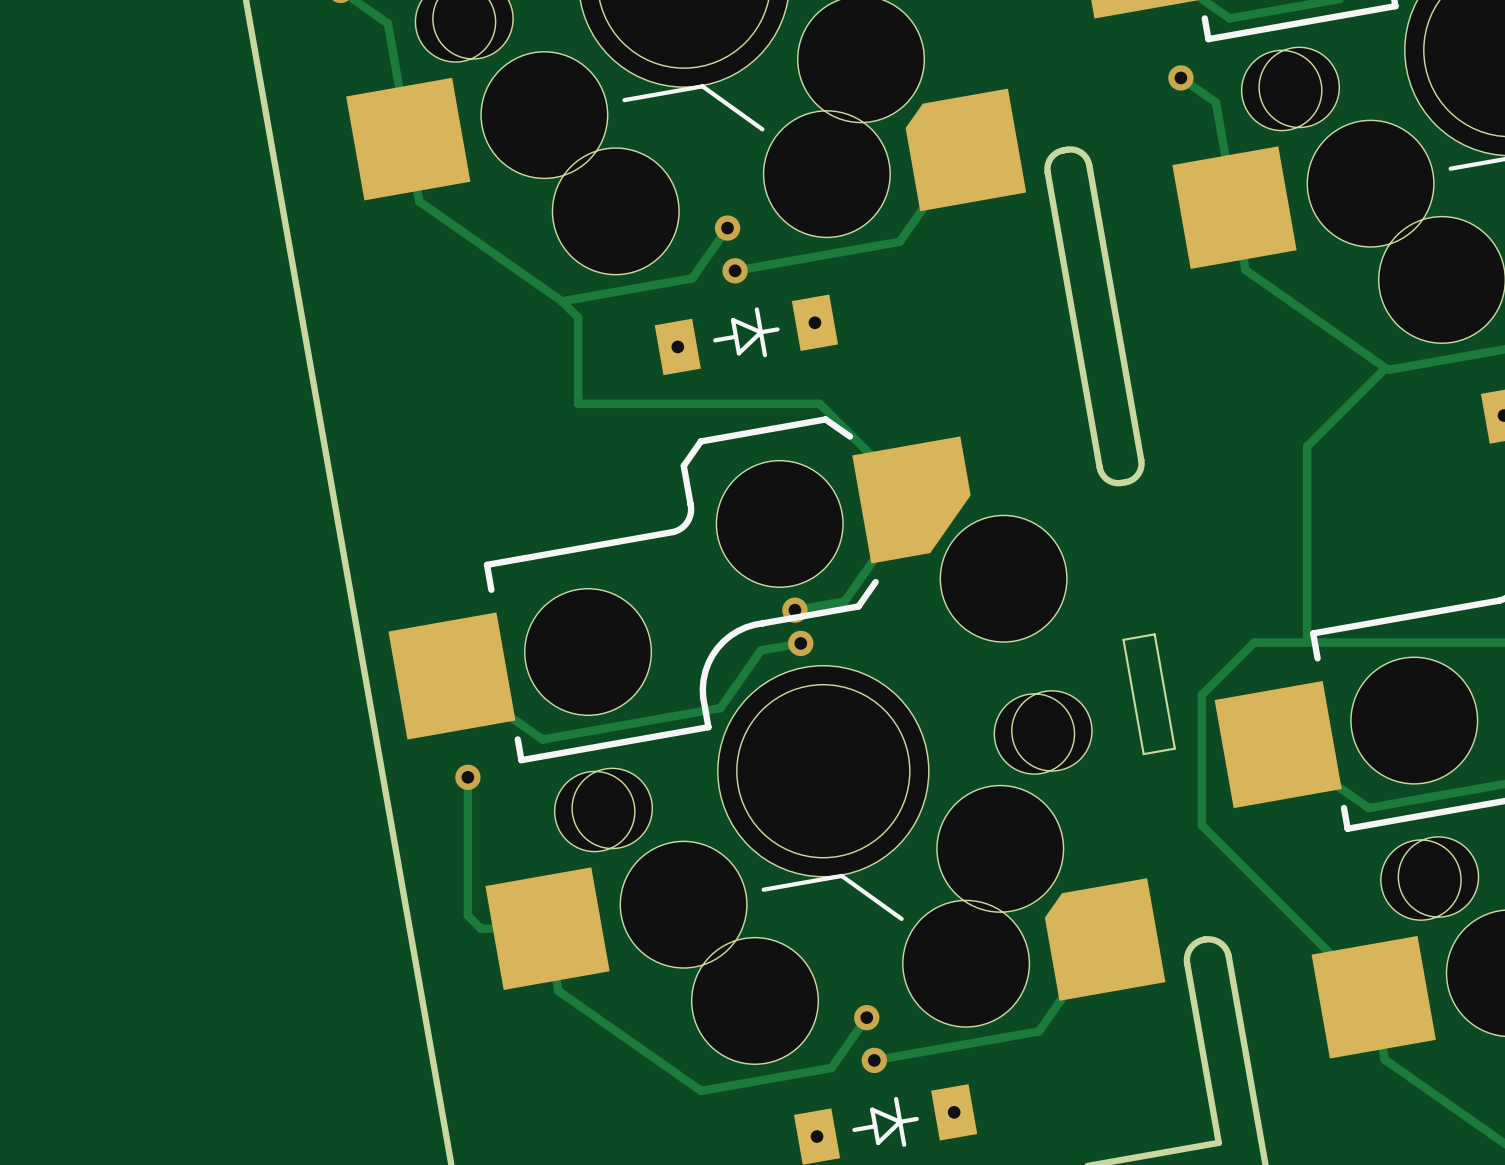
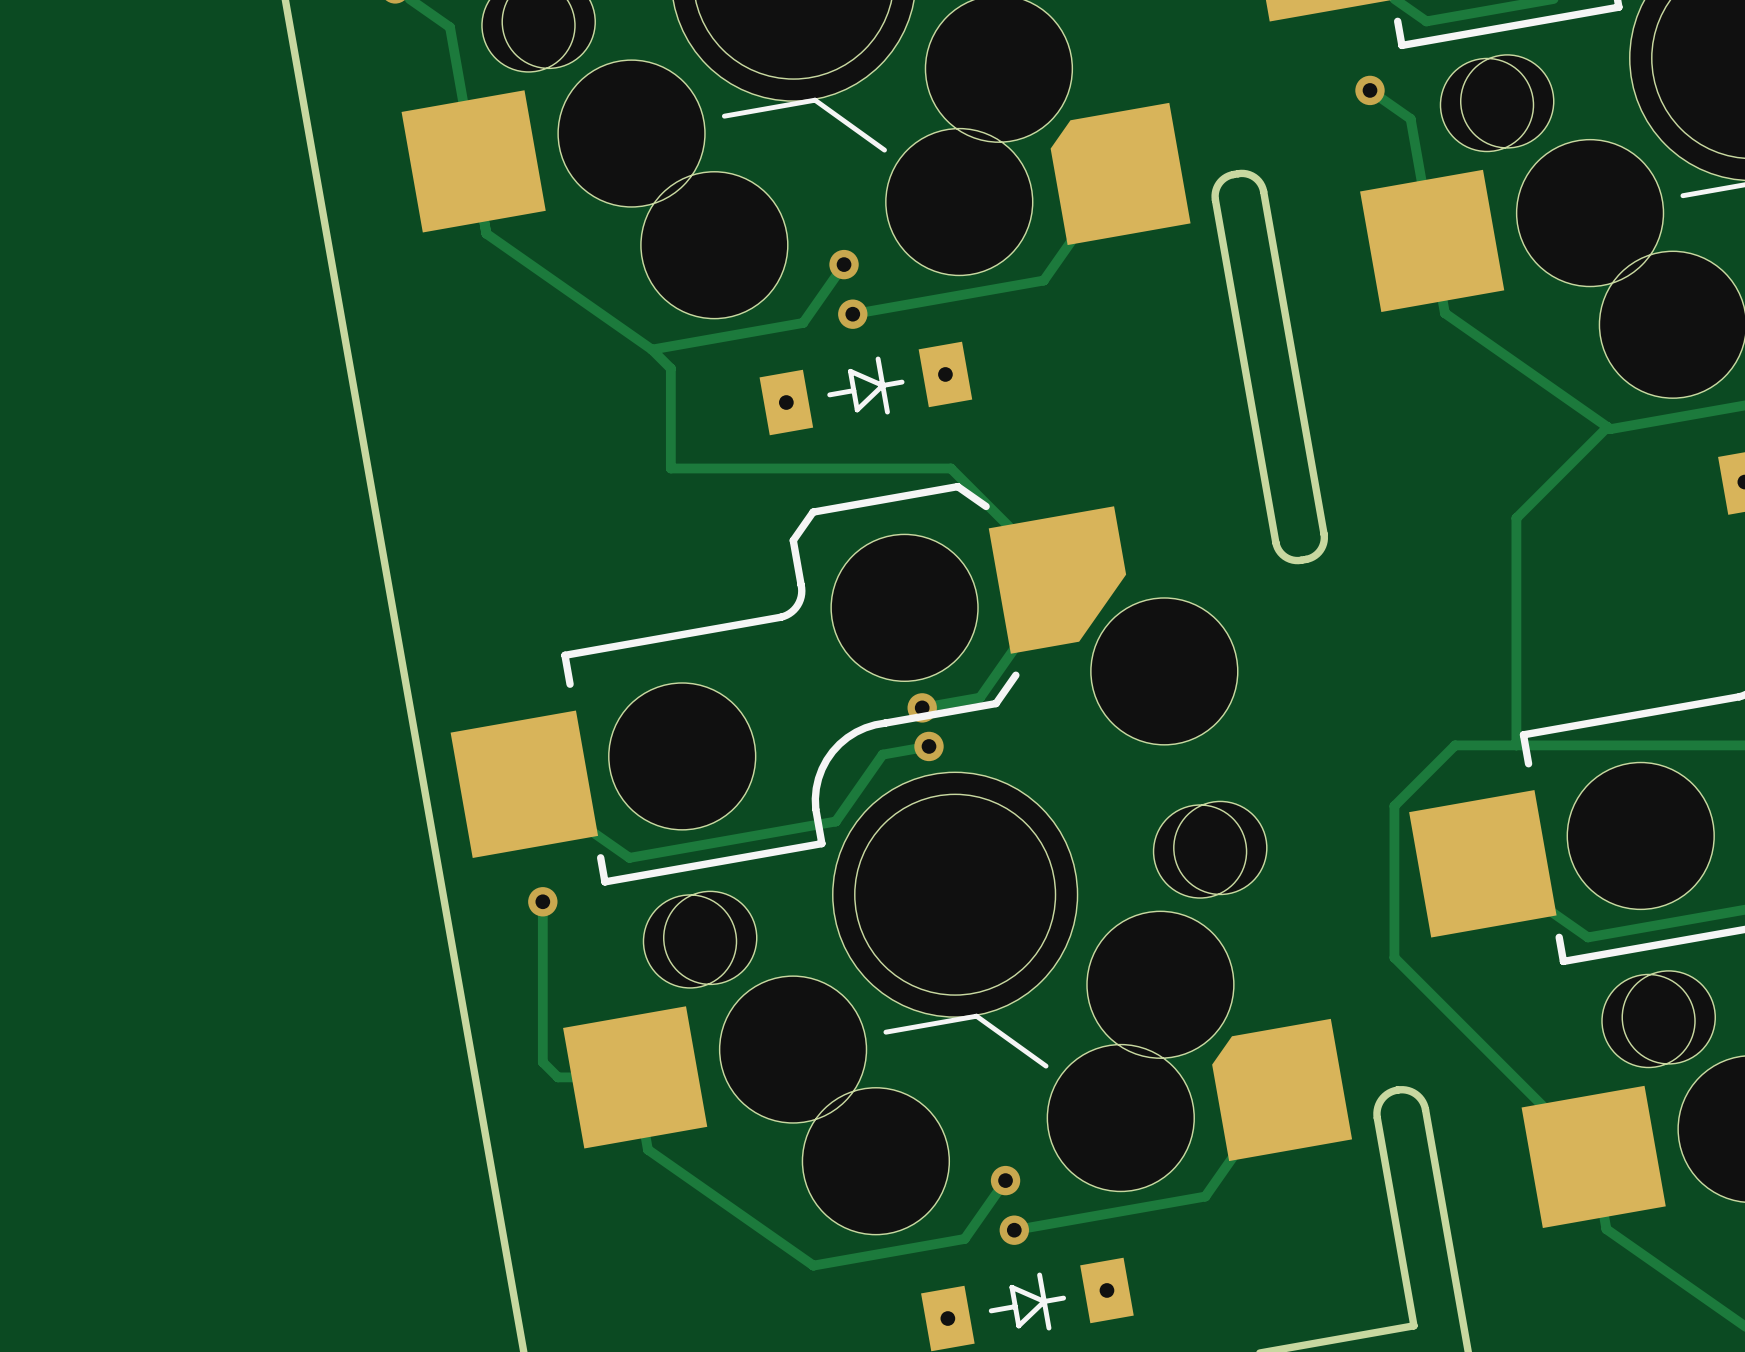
board edge: (1154, 634) (1174, 748) (1143, 754) (1123, 639) (1154, 634) -> none

